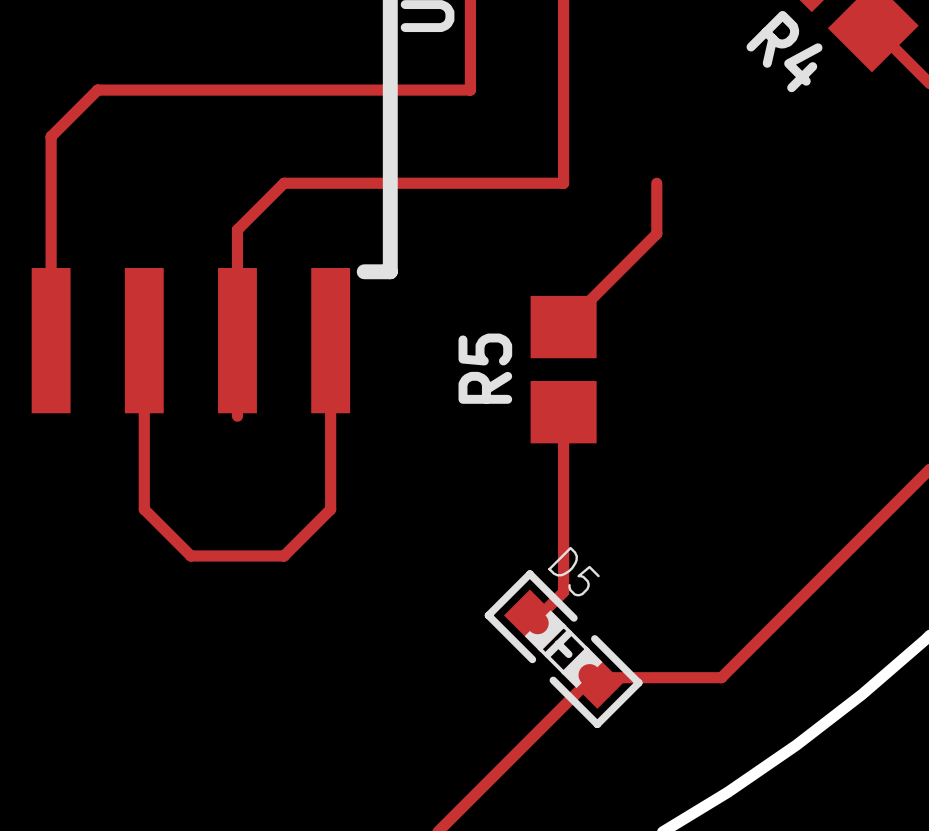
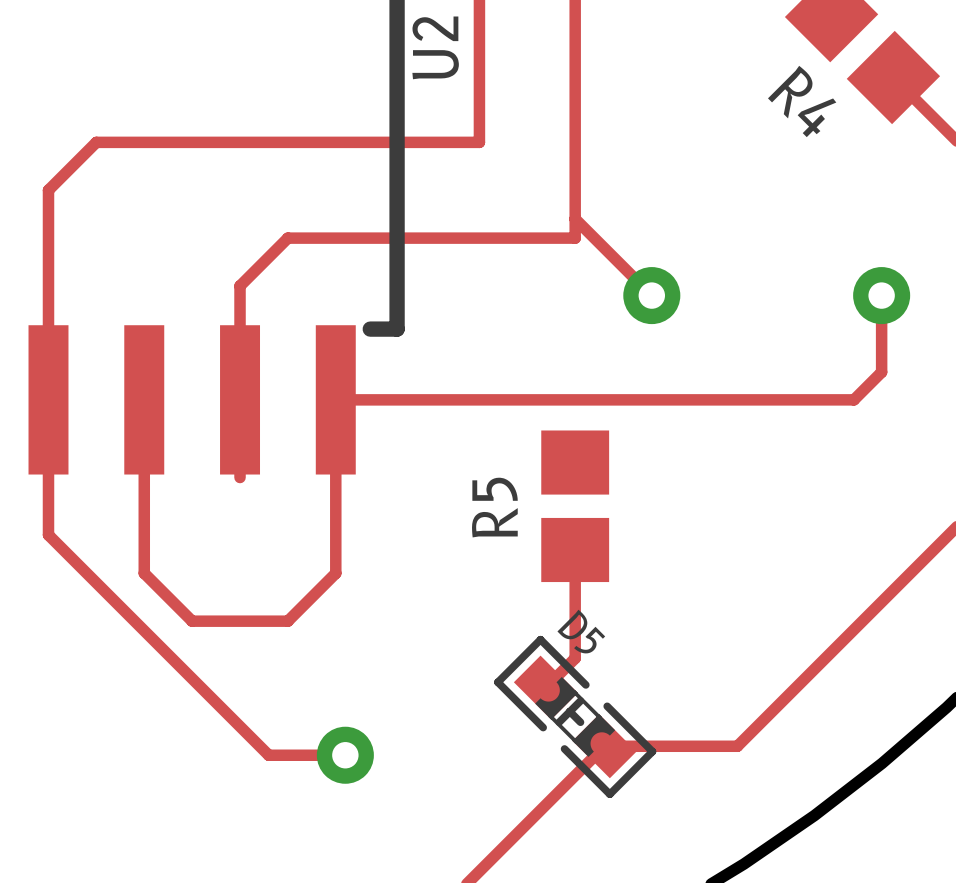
track: none -> (575, 218) (651, 295)
track: (656, 183) (656, 233) (563, 327) -> none
via: none -> (651, 295)
track: none -> (881, 295) (881, 372) (853, 399) (335, 399)
via: none -> (881, 295)
track: none -> (48, 399) (48, 534) (268, 755) (345, 755)
R5 position: (563, 369) -> (575, 506)
track: (563, 412) (563, 486) -> none
via: none -> (345, 755)

